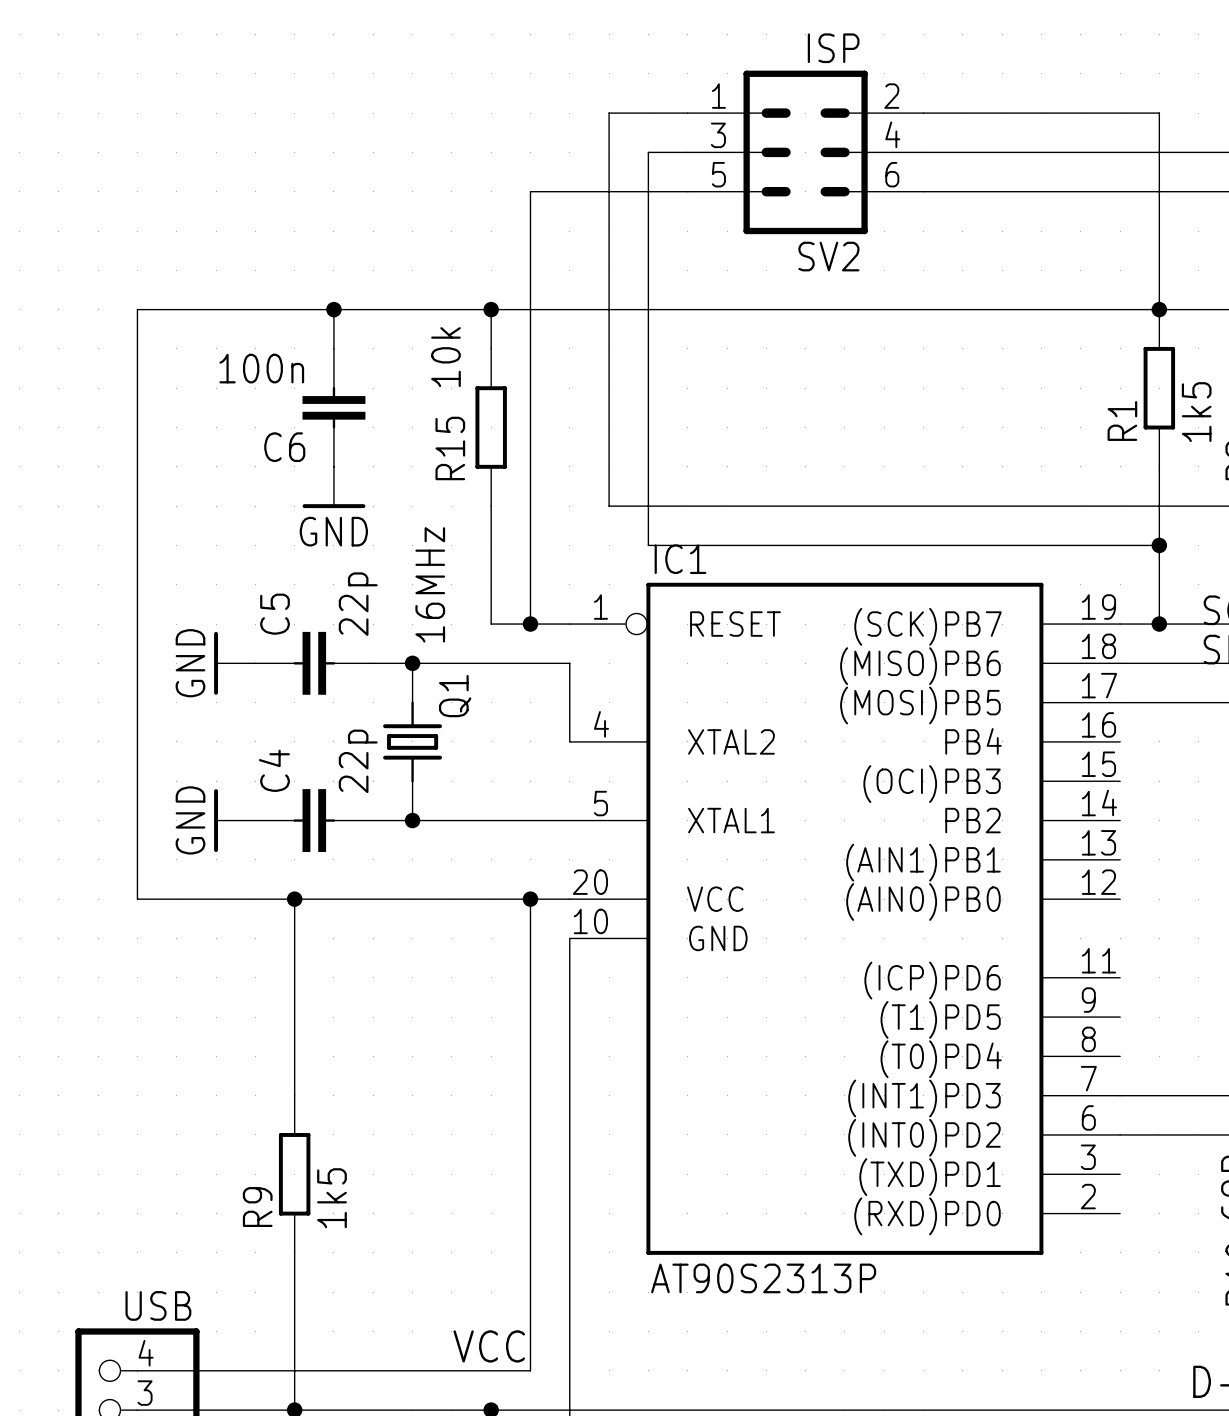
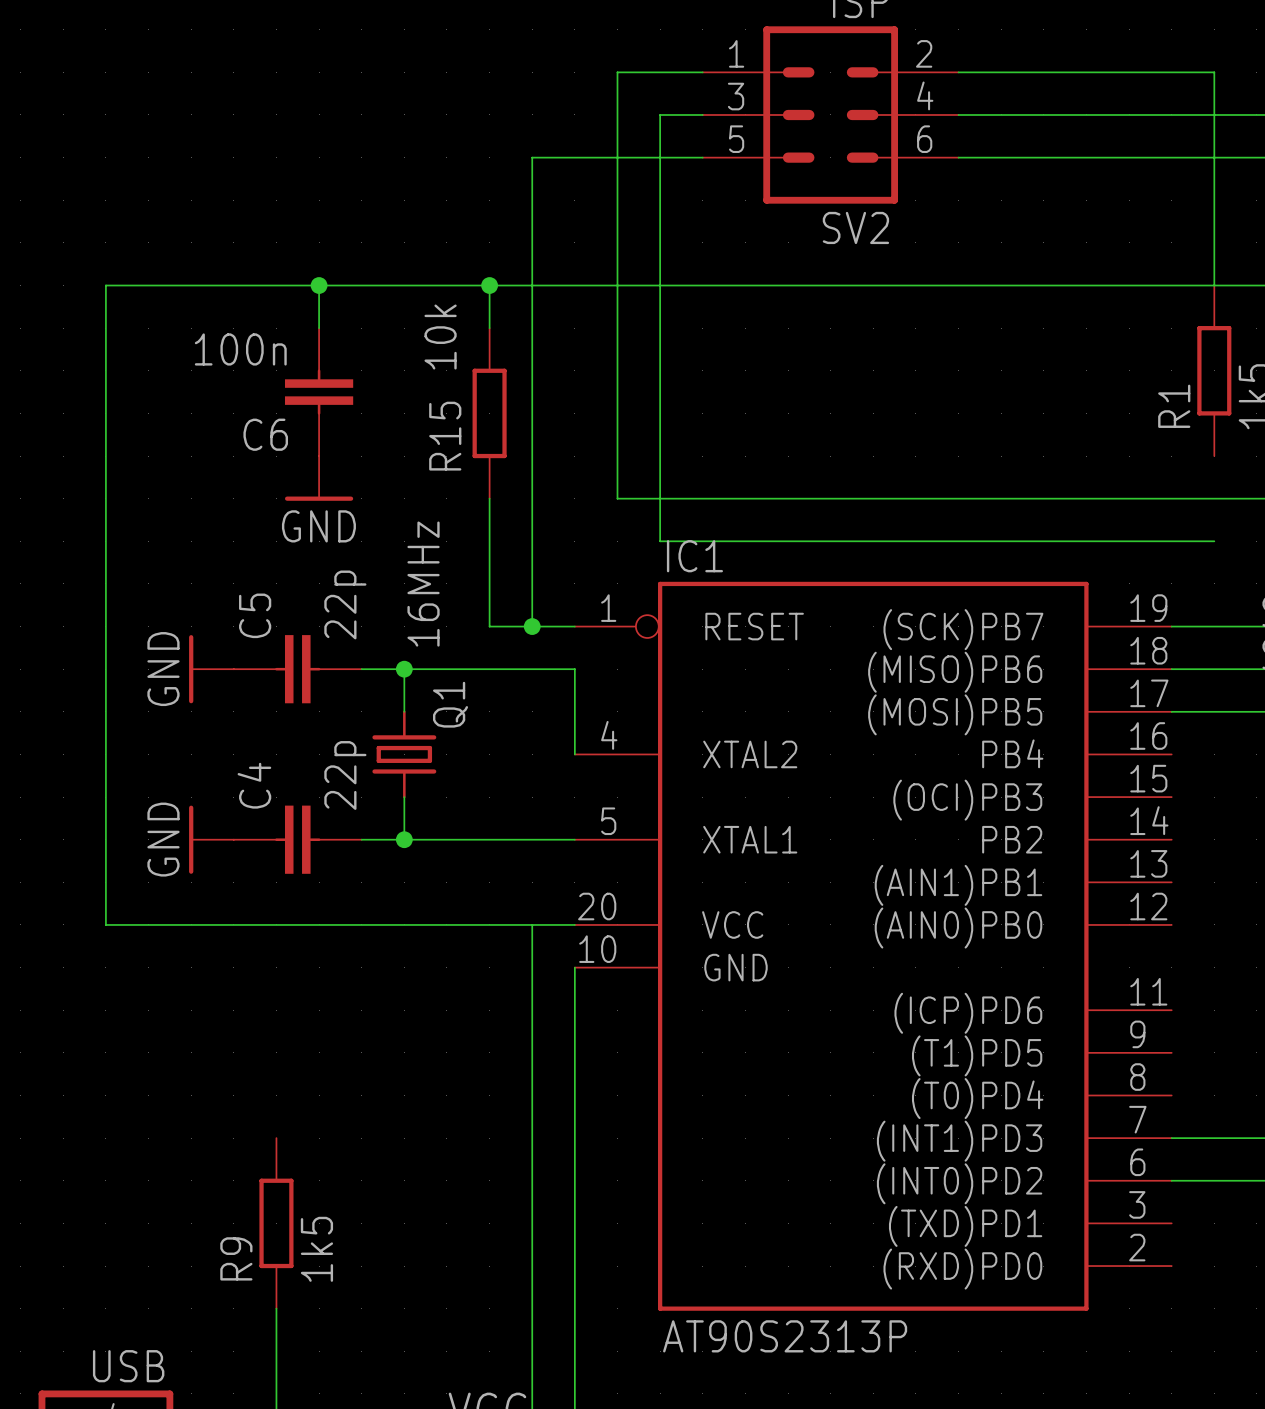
junction: (1159, 309) -> none
wire: (1159, 466) (1159, 624) -> none
junction: (1159, 545) -> none
junction: (1159, 624) -> none
wire: (294, 899) (294, 1095) -> none
junction: (294, 899) -> none
junction: (530, 899) -> none

